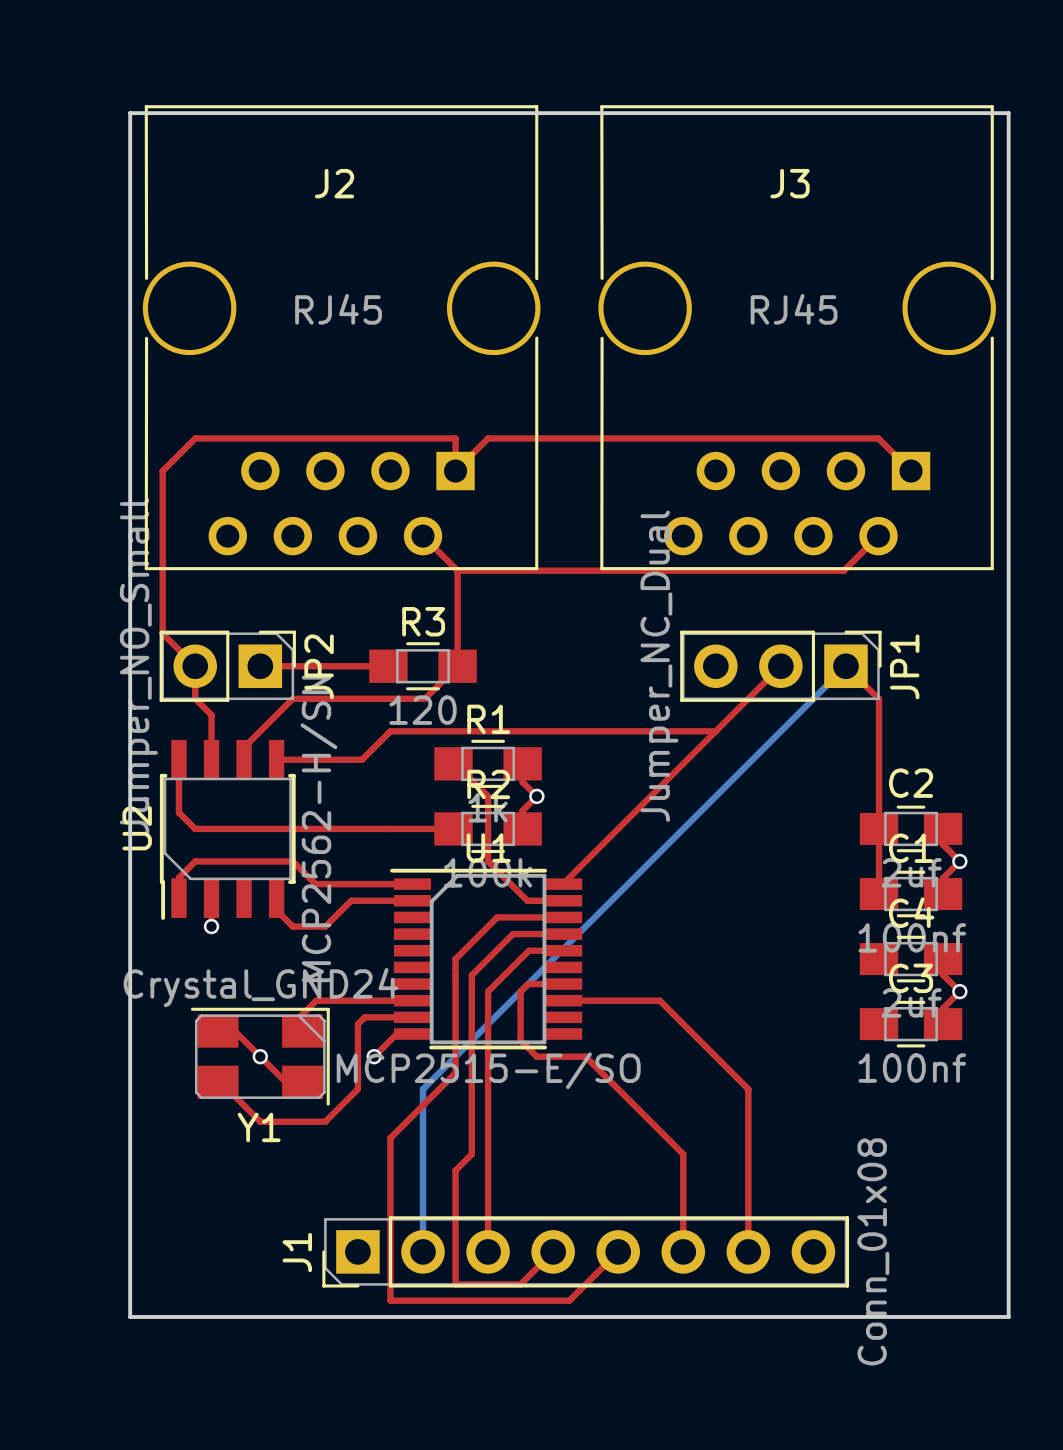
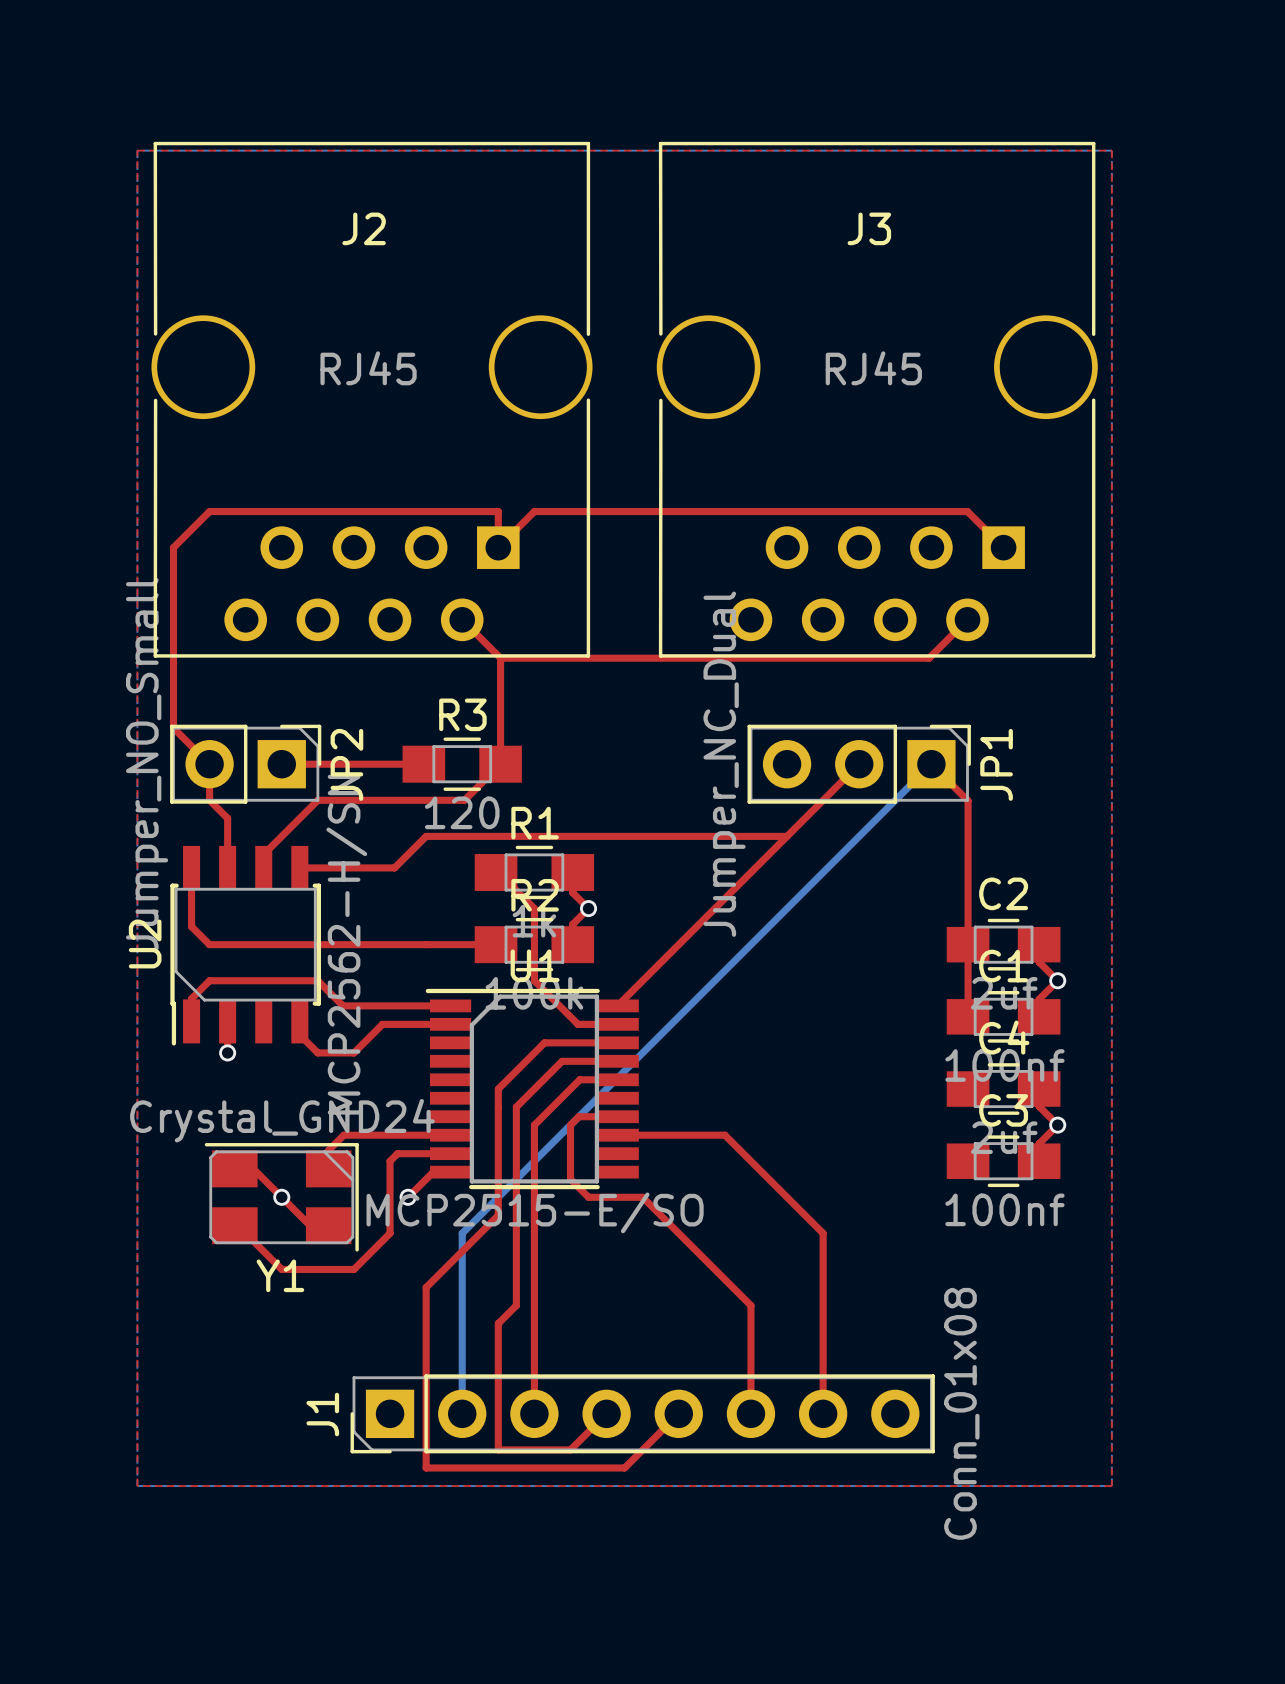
board edge: (130, 113) (130, 1316) (1008, 1316) (1008, 113) (130, 113) -> none

